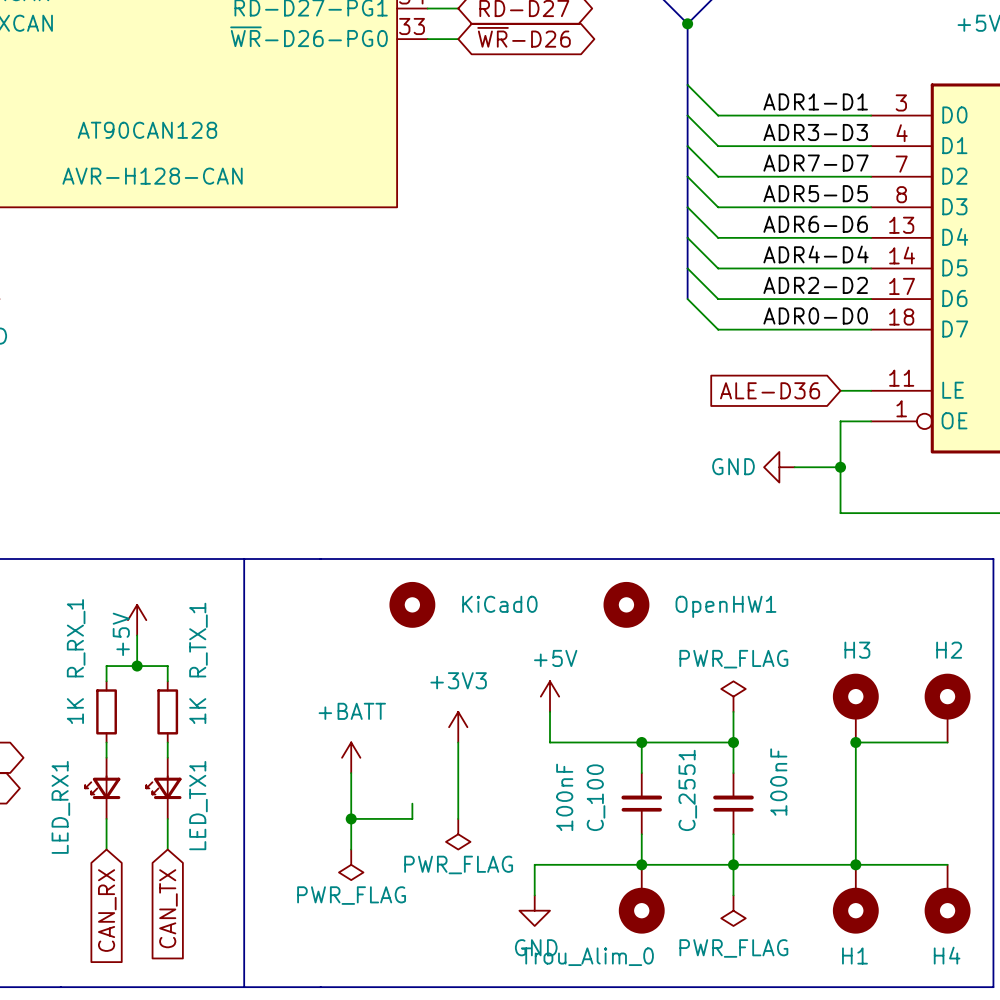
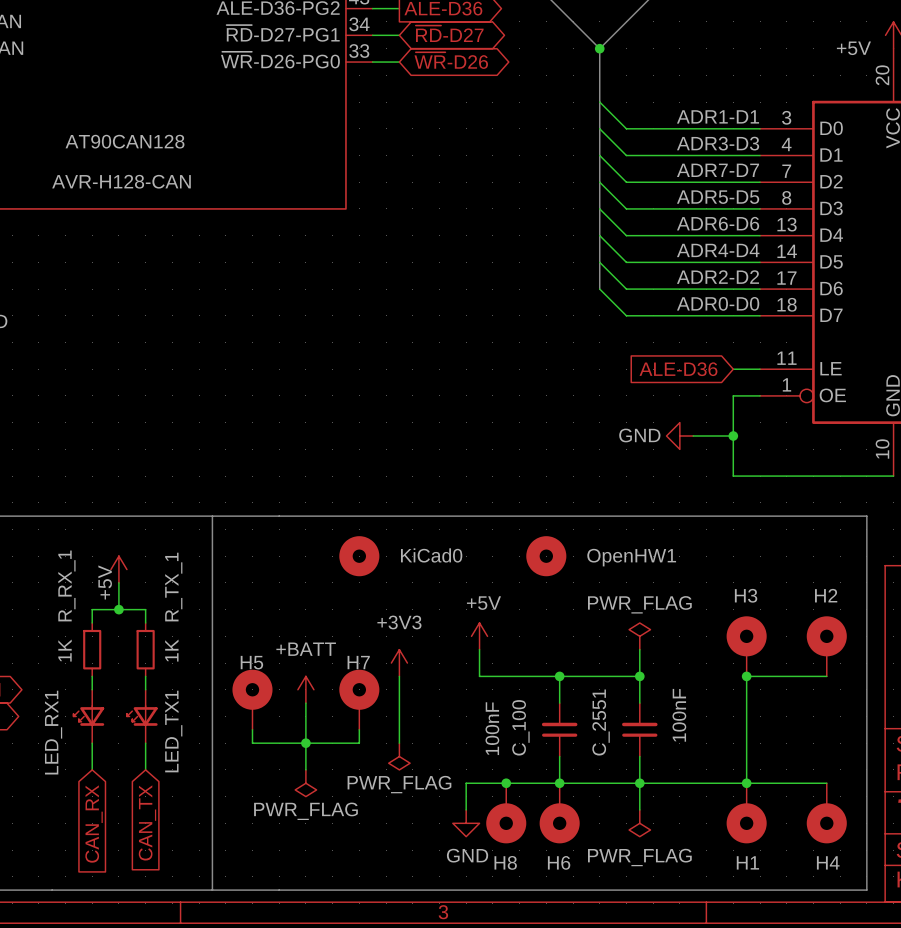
H5: none -> (252, 699)
H7: none -> (359, 699)
wire: none -> (252, 729) (252, 743) (305, 743)
junction: none -> (506, 783)
H8: none -> (506, 813)
Trou_Alim_0 name: Trou_Alim_0 (587, 956) -> H6 (559, 862)

